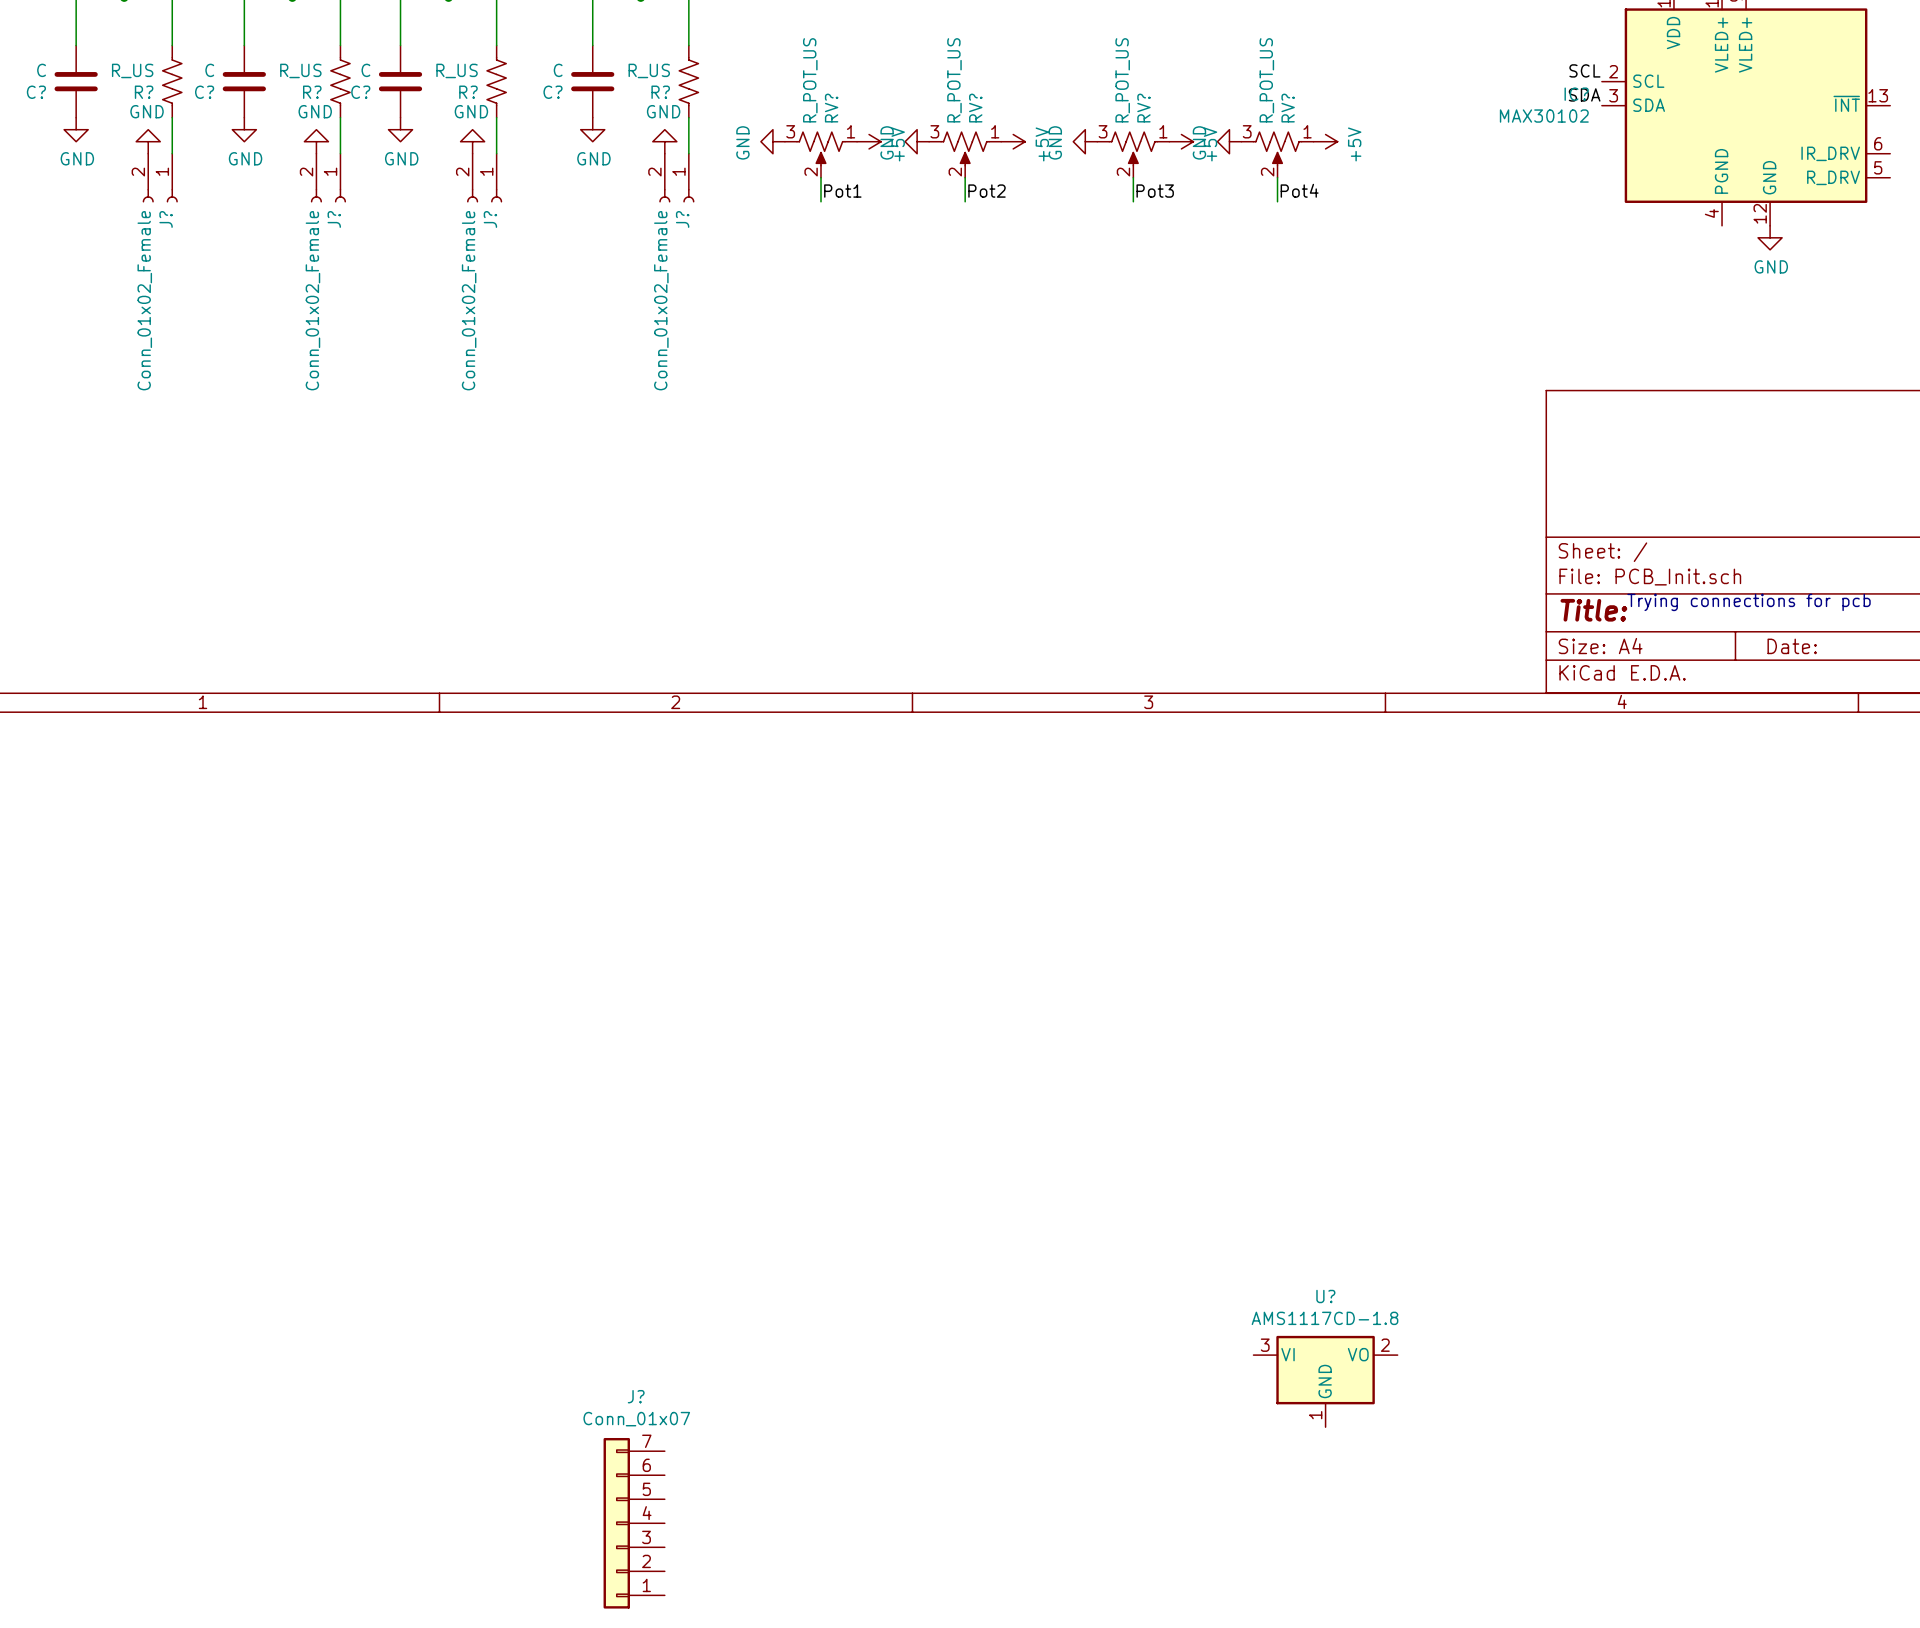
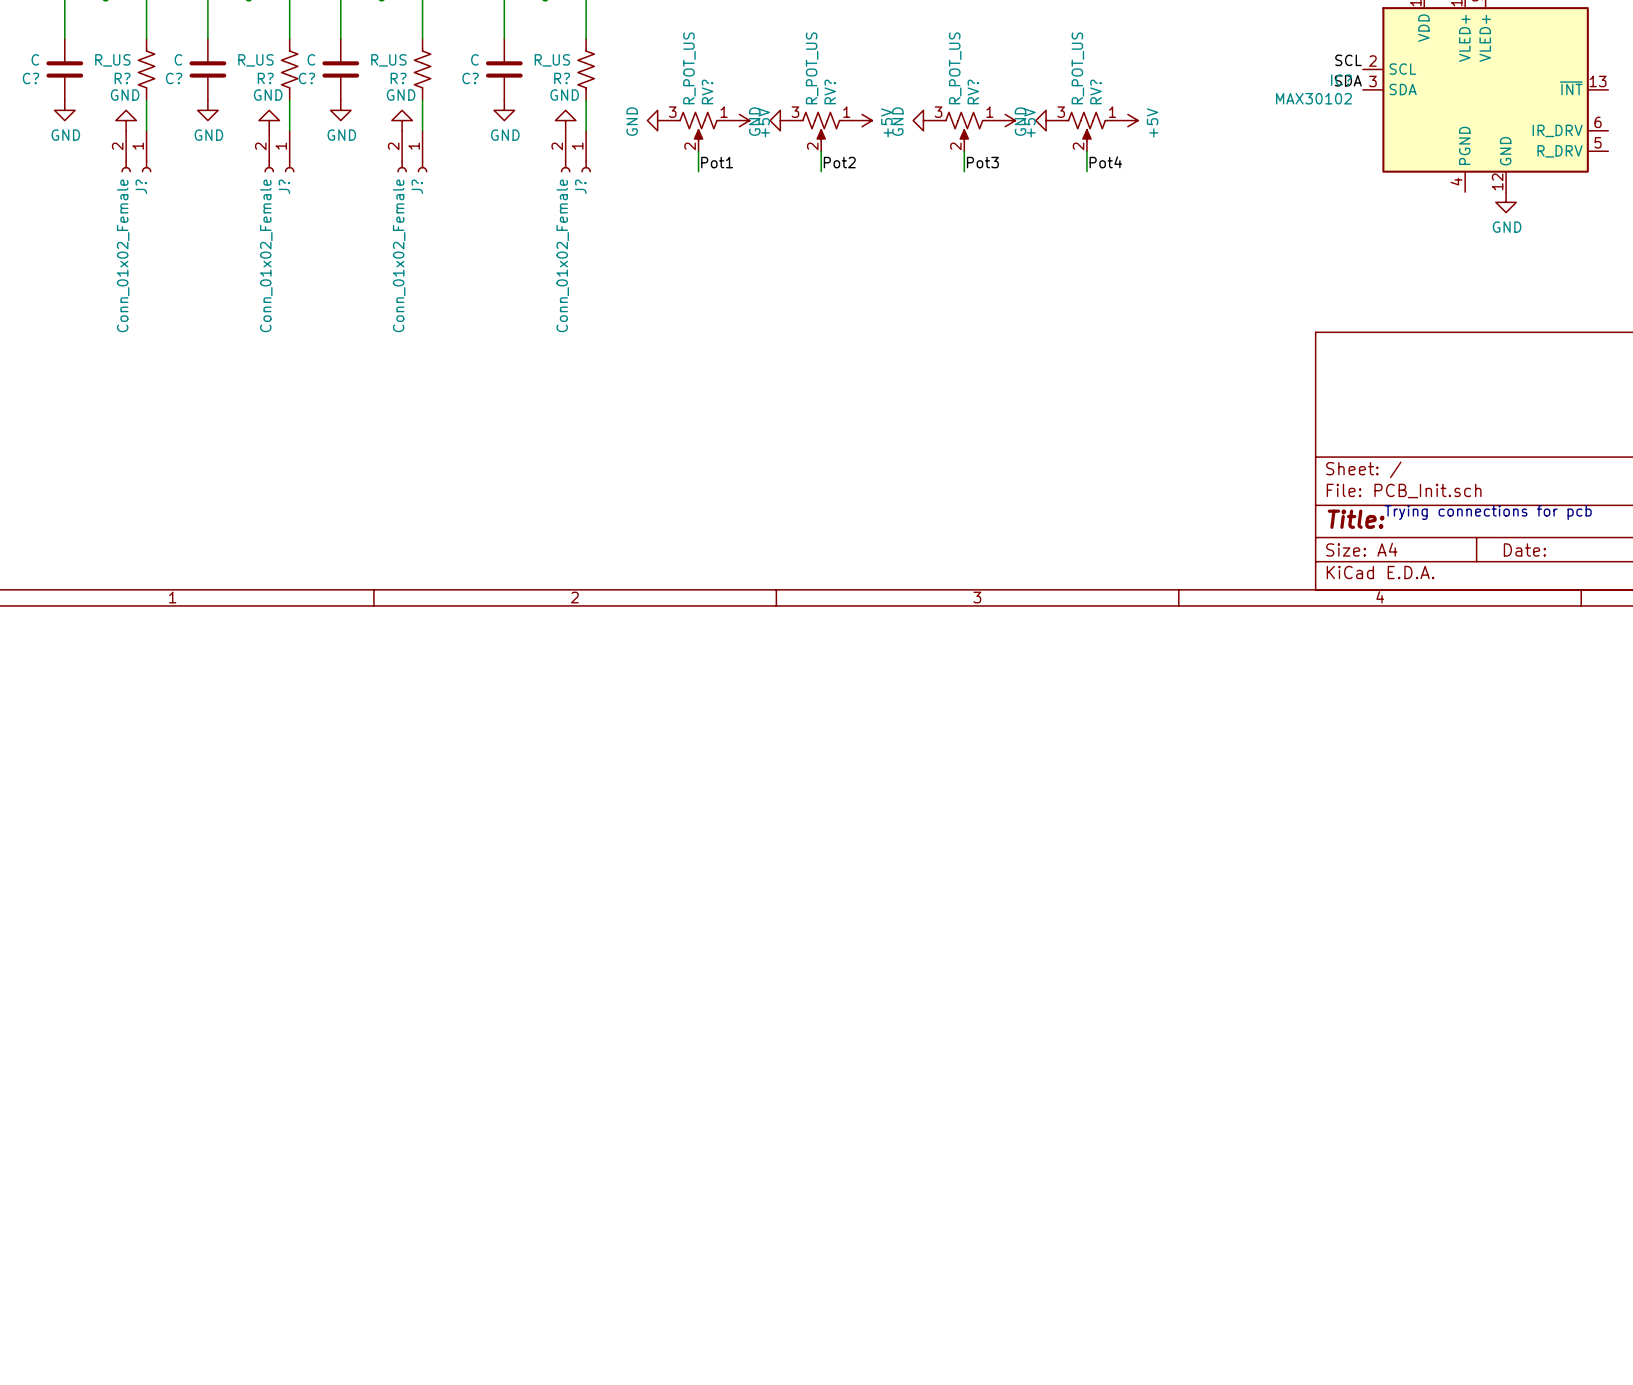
U?: AMS1117CD-1.8 (1325, 1381) -> none
J?: Conn_01x07 (634, 1523) -> none

